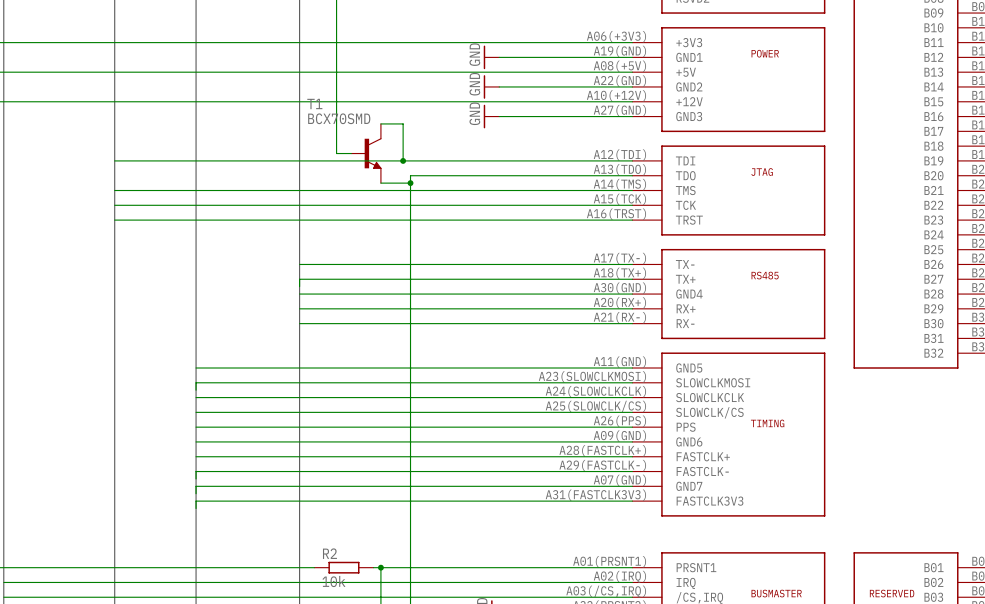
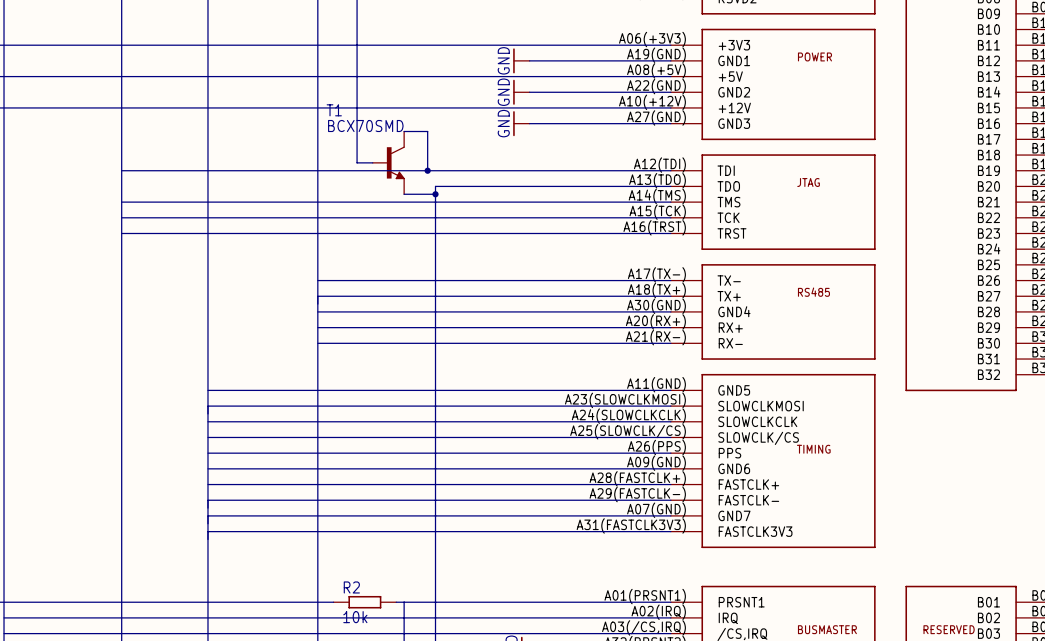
junction: (380, 567) -> none

